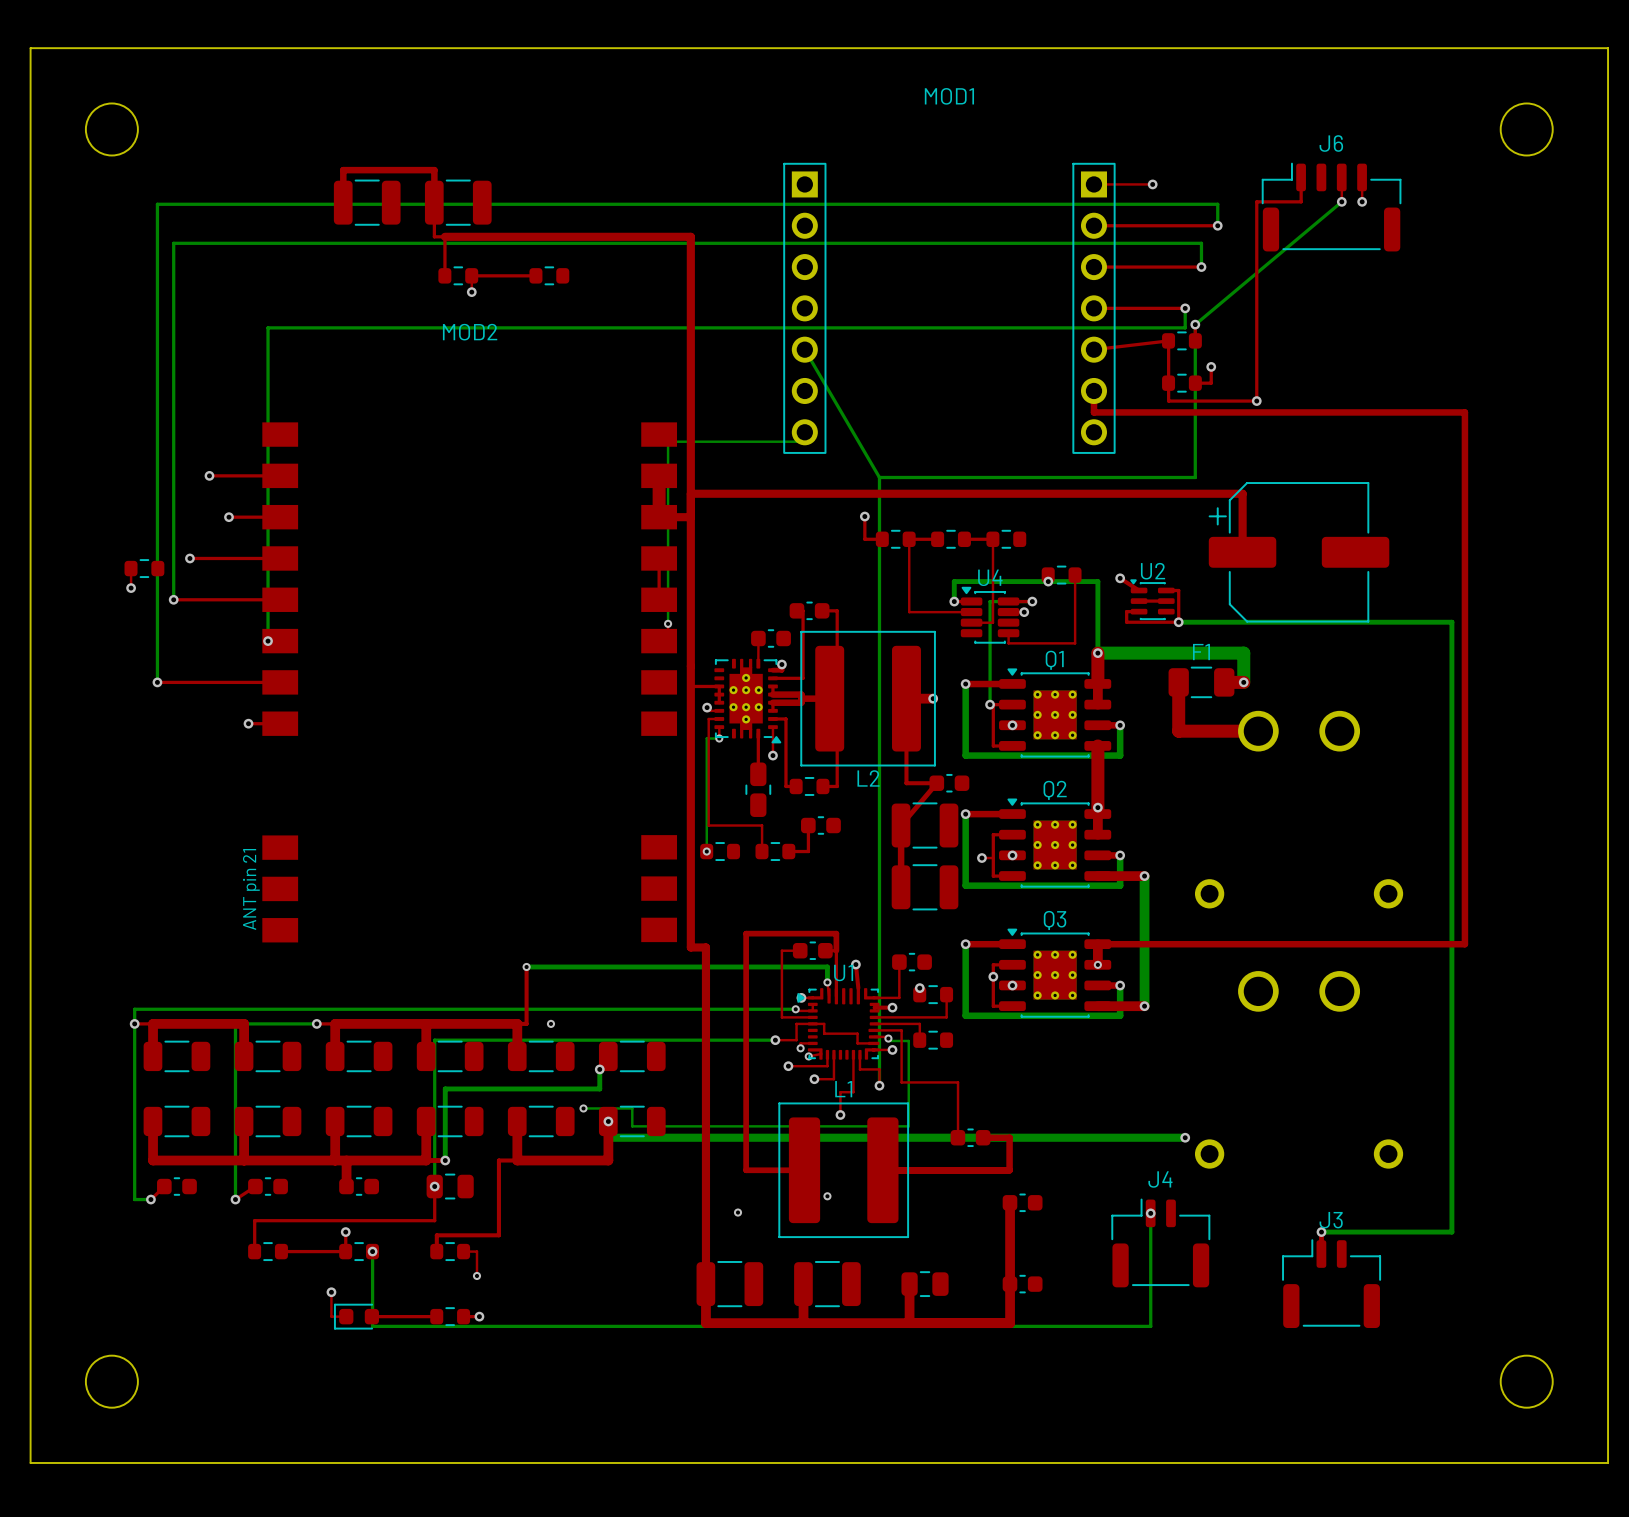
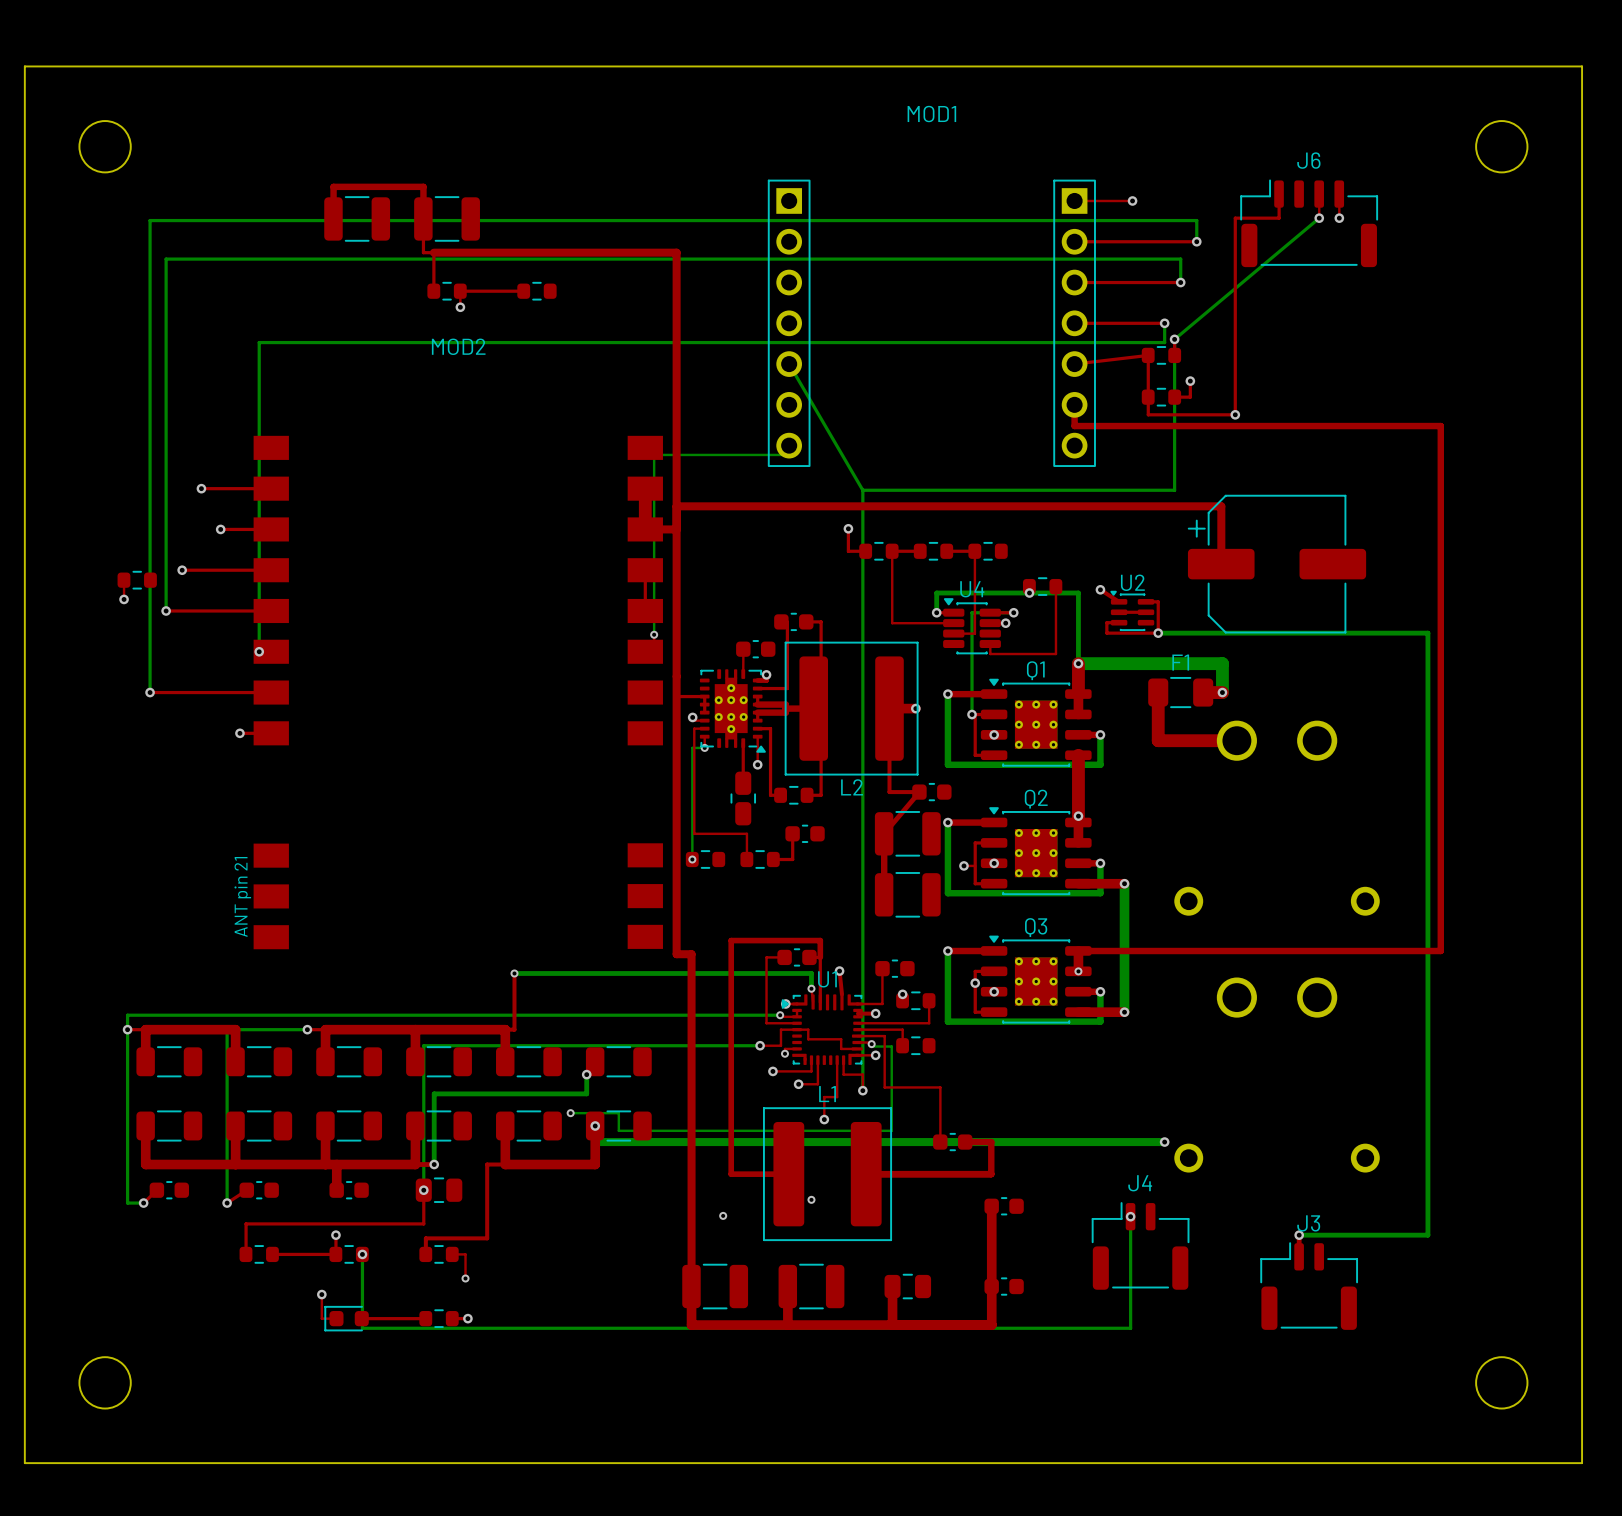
via: (550, 1023) -> none
top track: (820, 1053) (808, 1056) -> none
via: (808, 1056) -> none

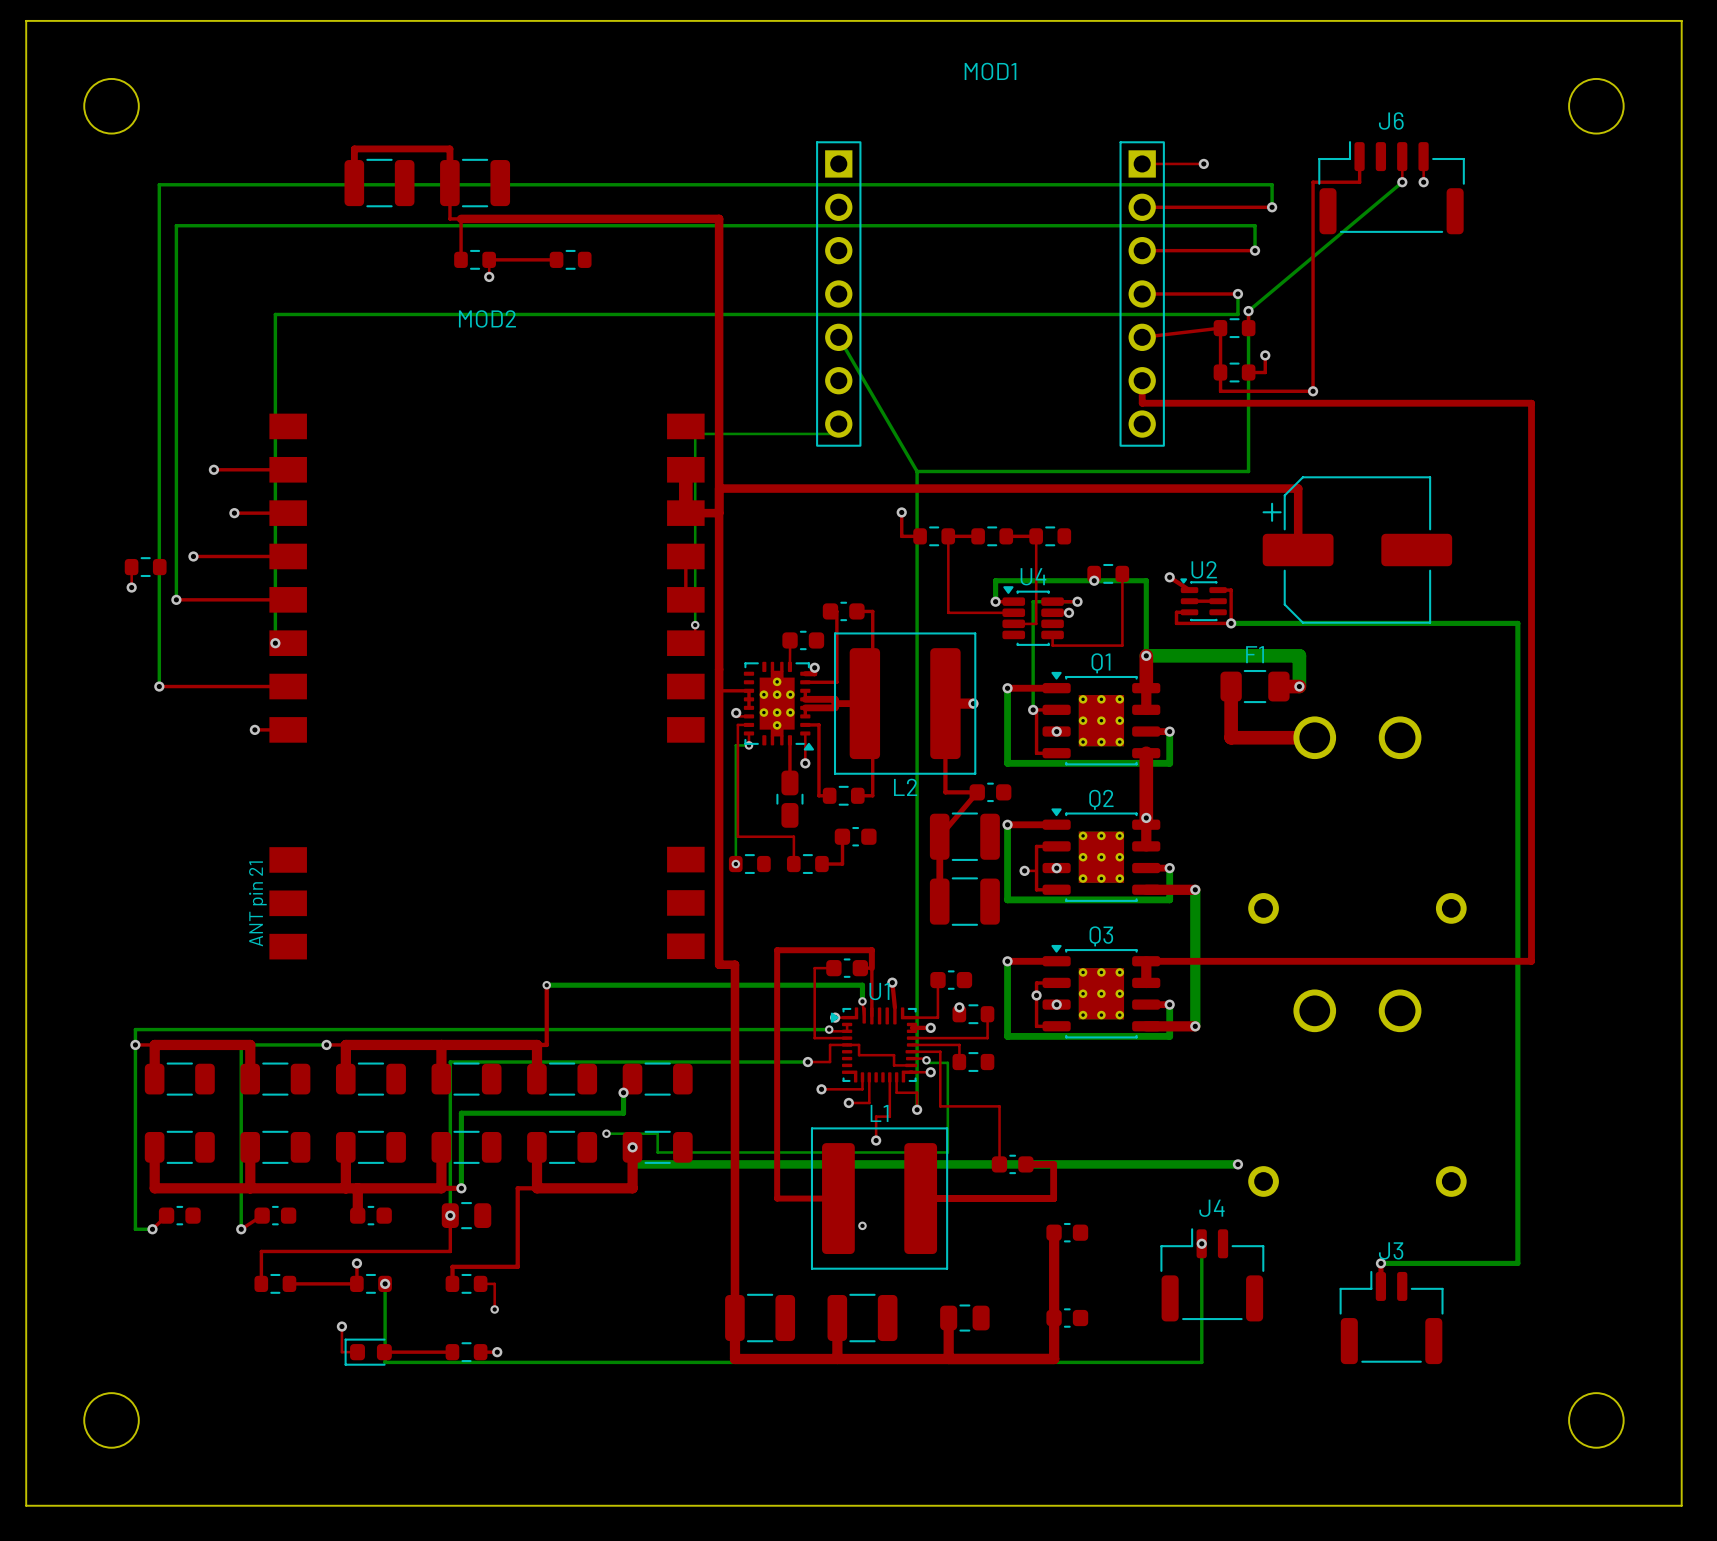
via: (1078, 971) -> none
top track: (797, 1048) (784, 1048) (784, 1053) -> none
via: (784, 1053) -> none
via: (723, 1215) -> none

